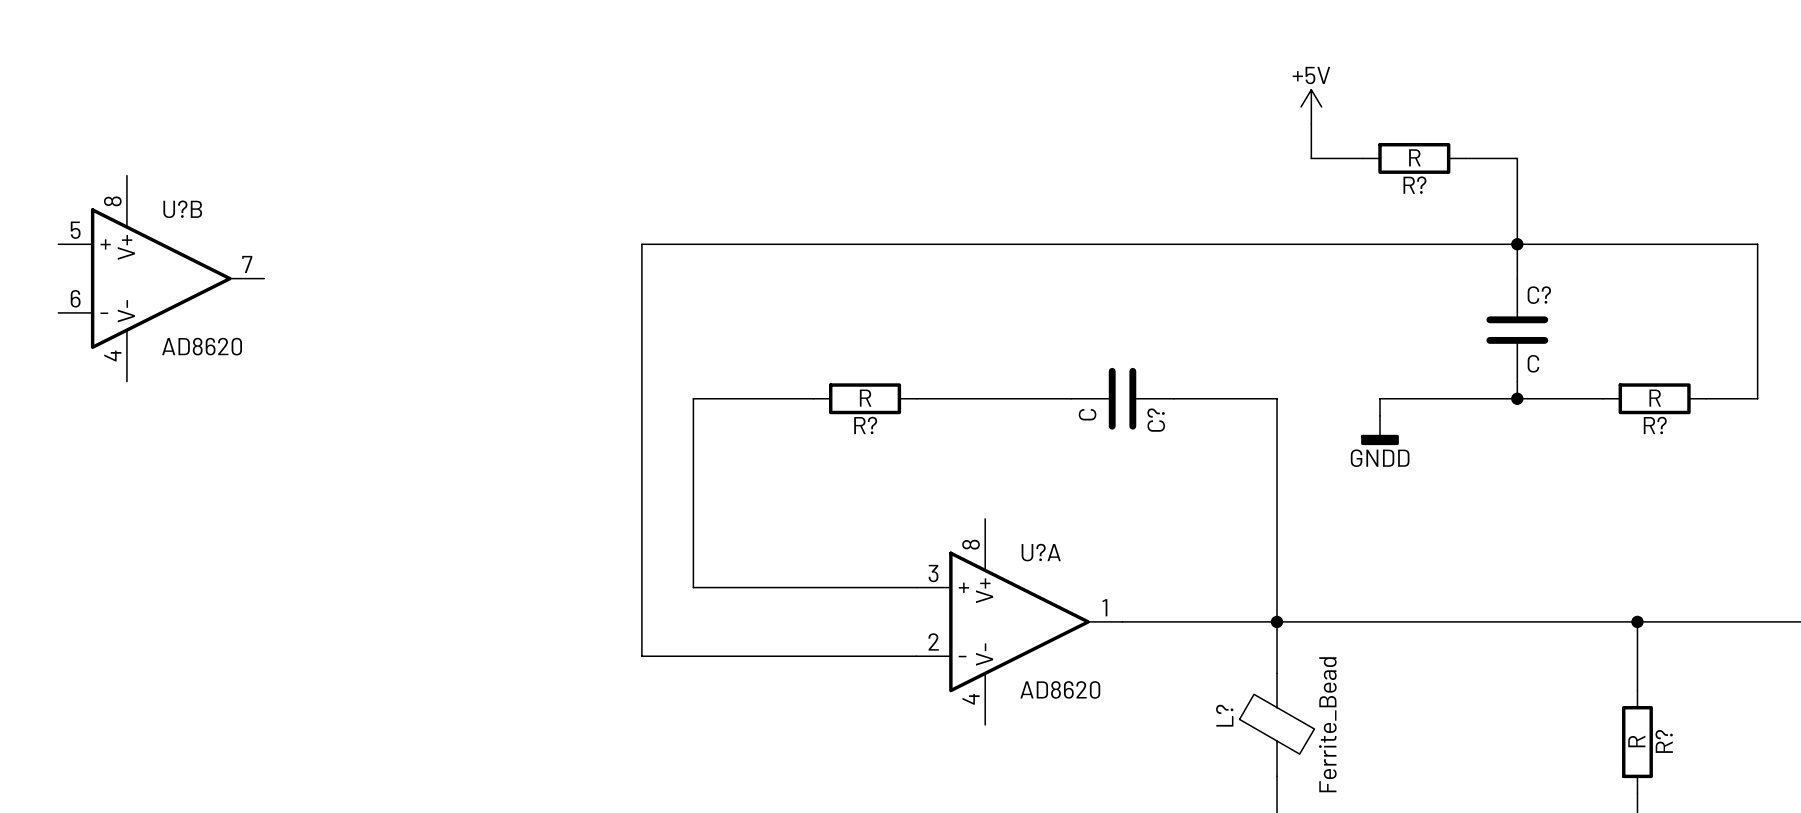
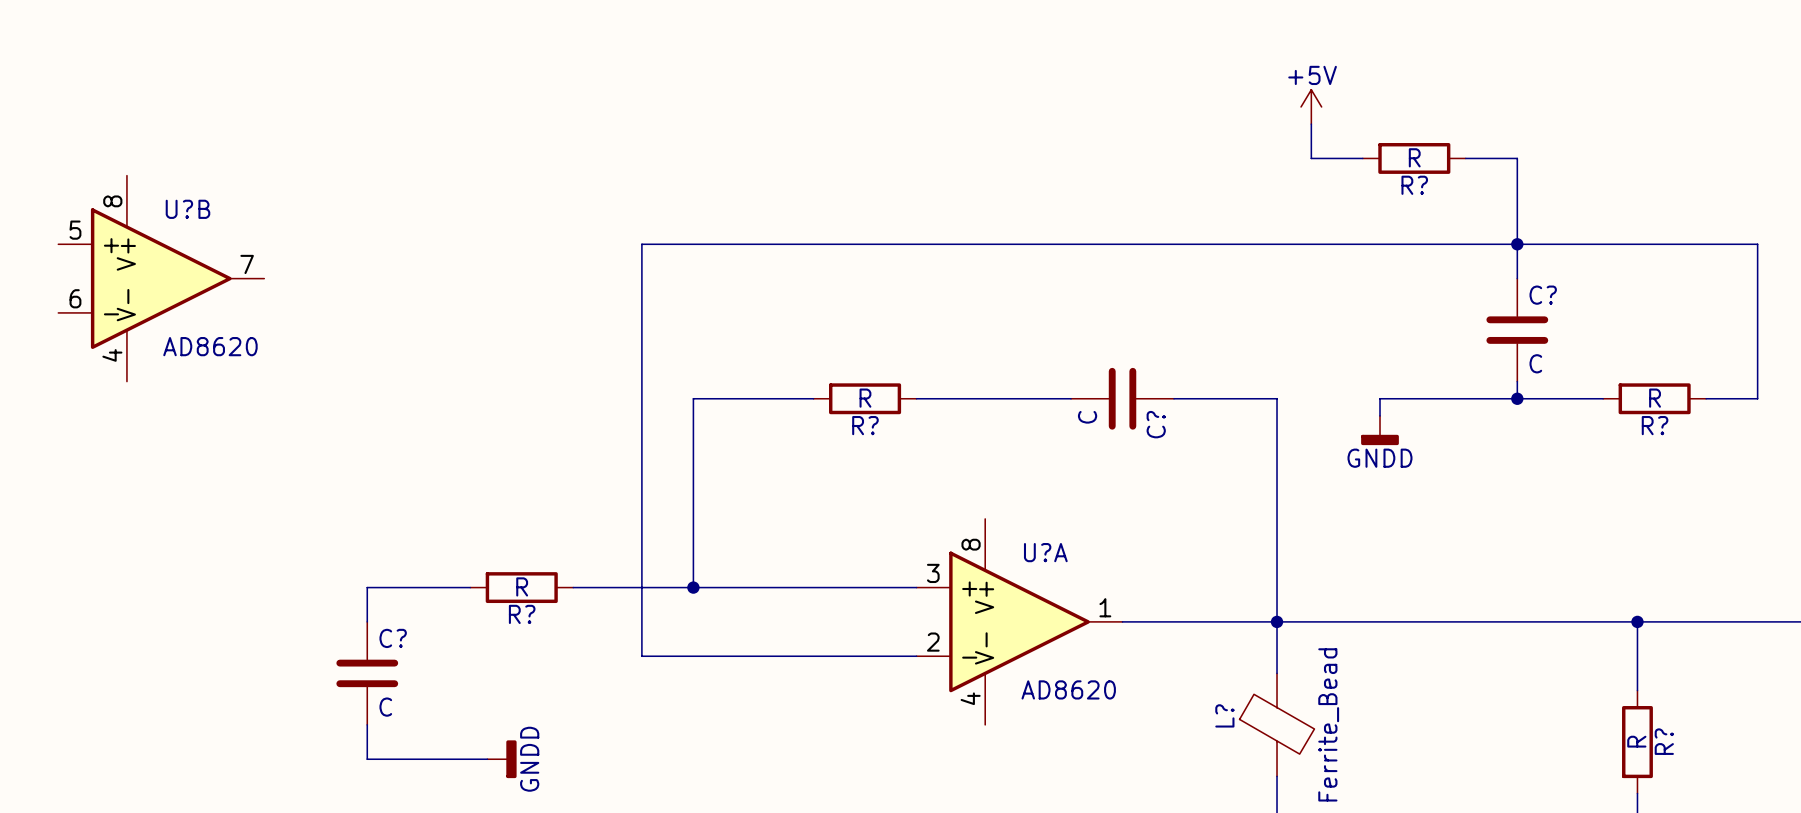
wire: none -> (470, 587) (367, 587) (367, 621)
R?: none -> R (521, 587)
wire: none -> (573, 587) (693, 587)
junction: none -> (693, 587)
C?: none -> C (367, 673)
wire: none -> (367, 724) (367, 759) (487, 759)
power symbol: none -> GNDD (502, 759)

